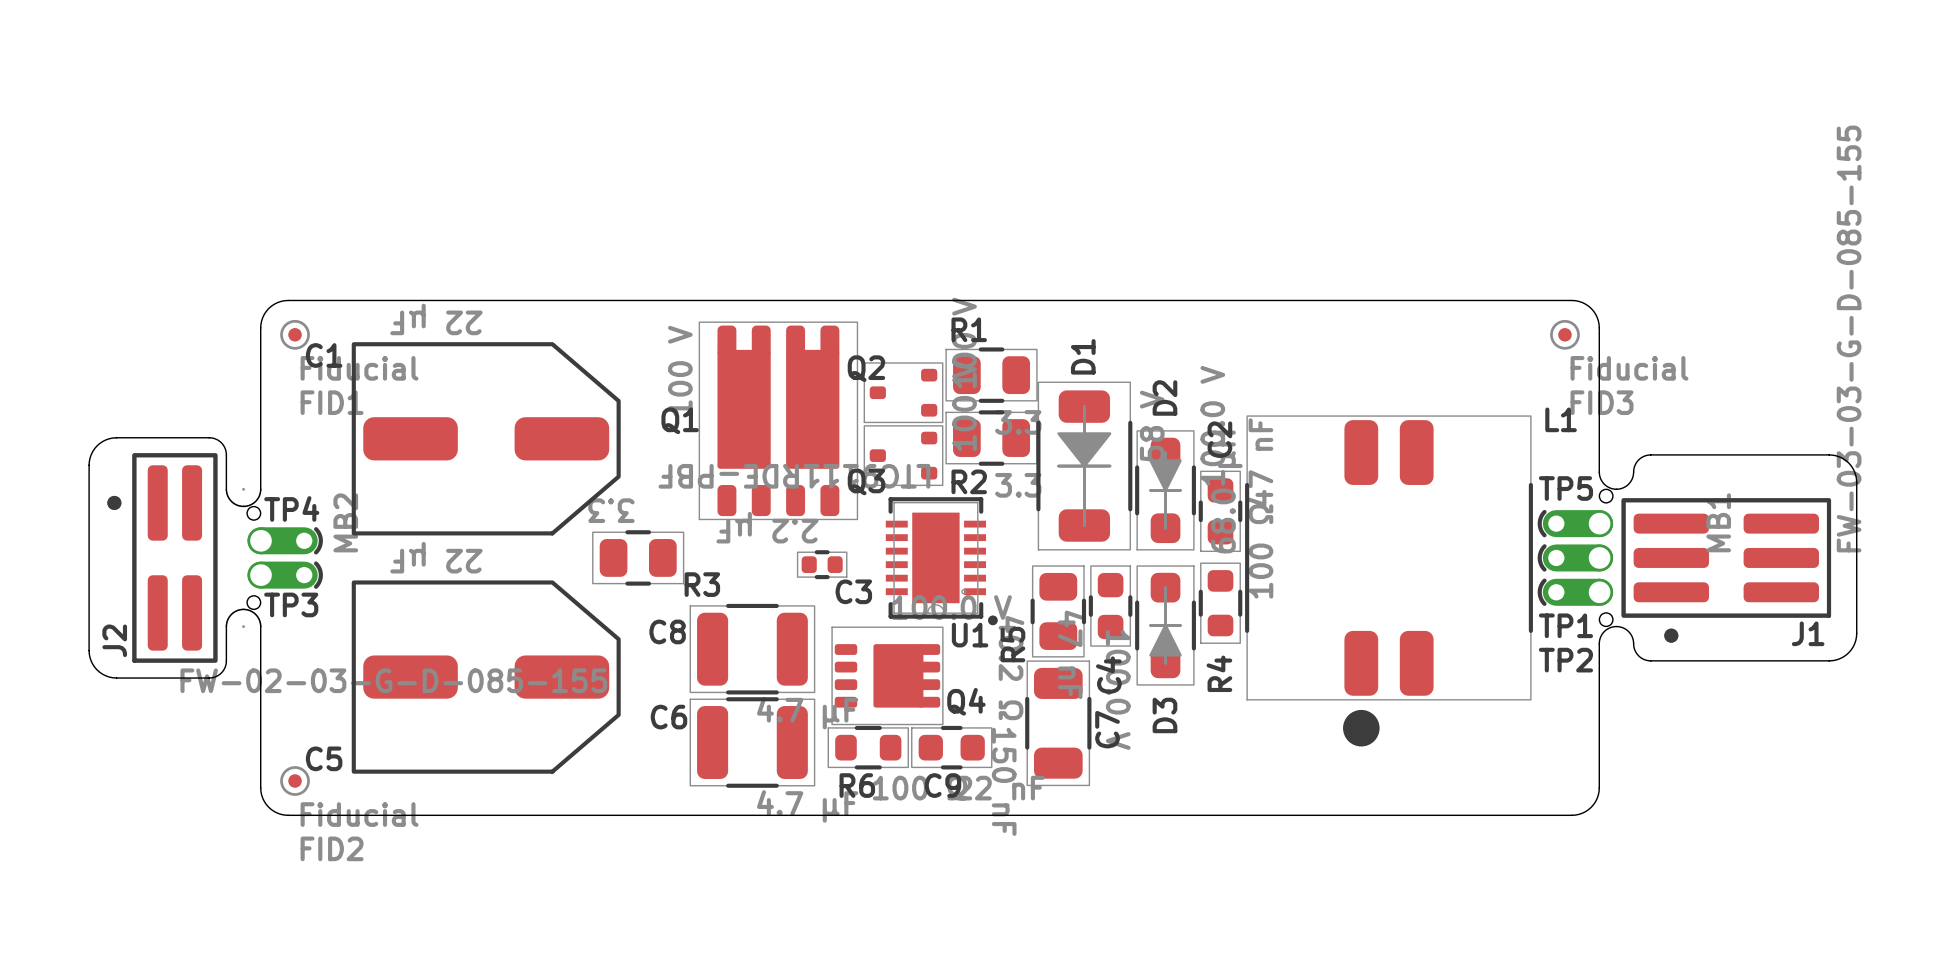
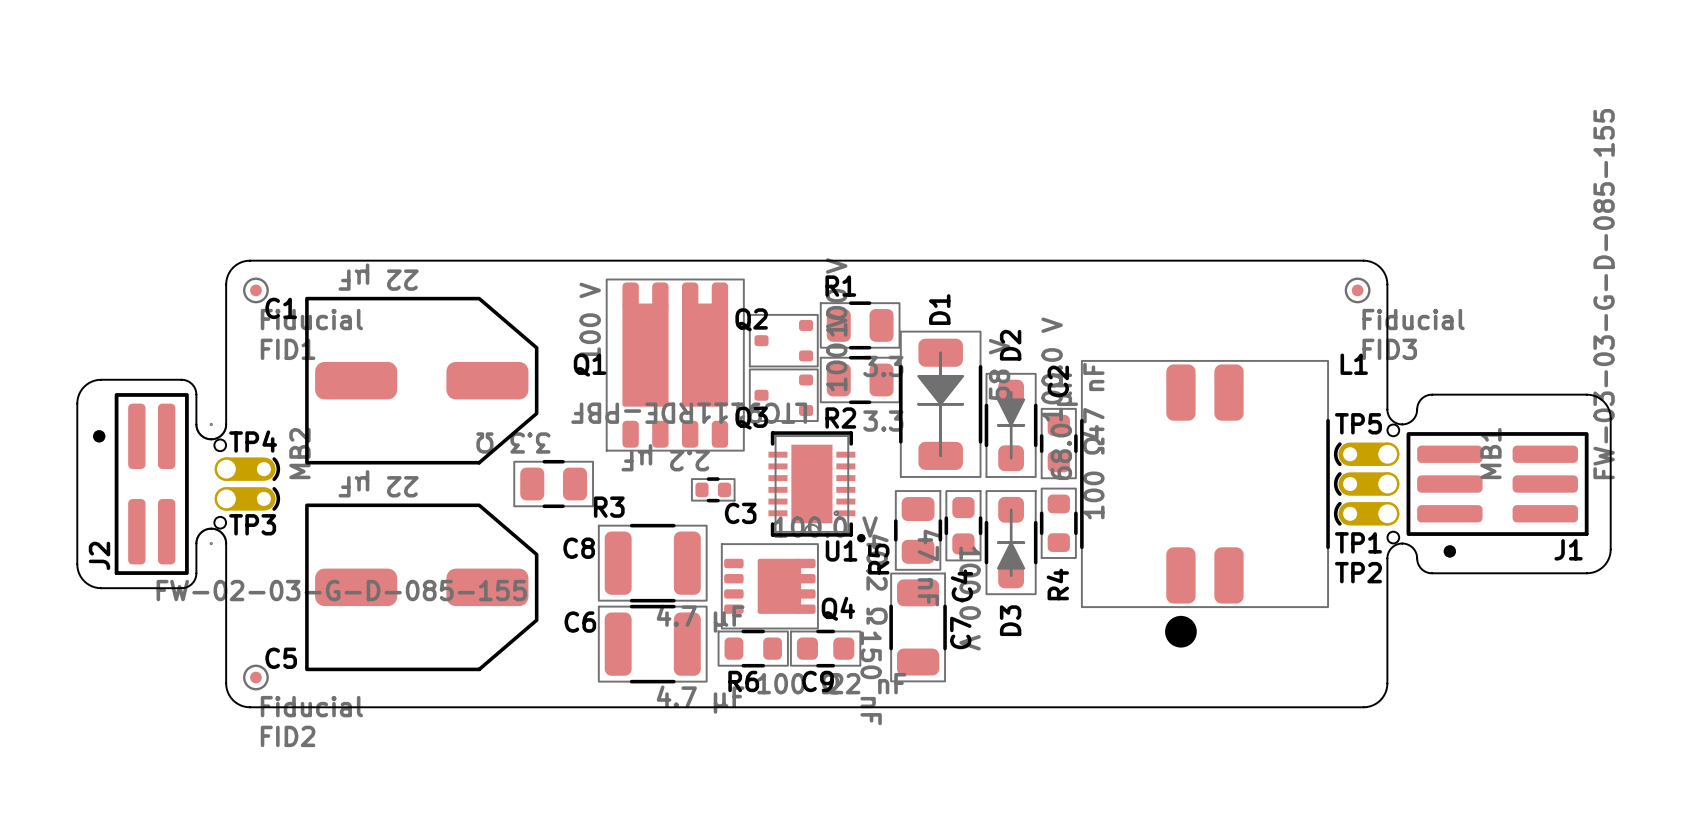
R3 value: 3.3 (611, 510) -> 3.3 Ω (513, 442)

